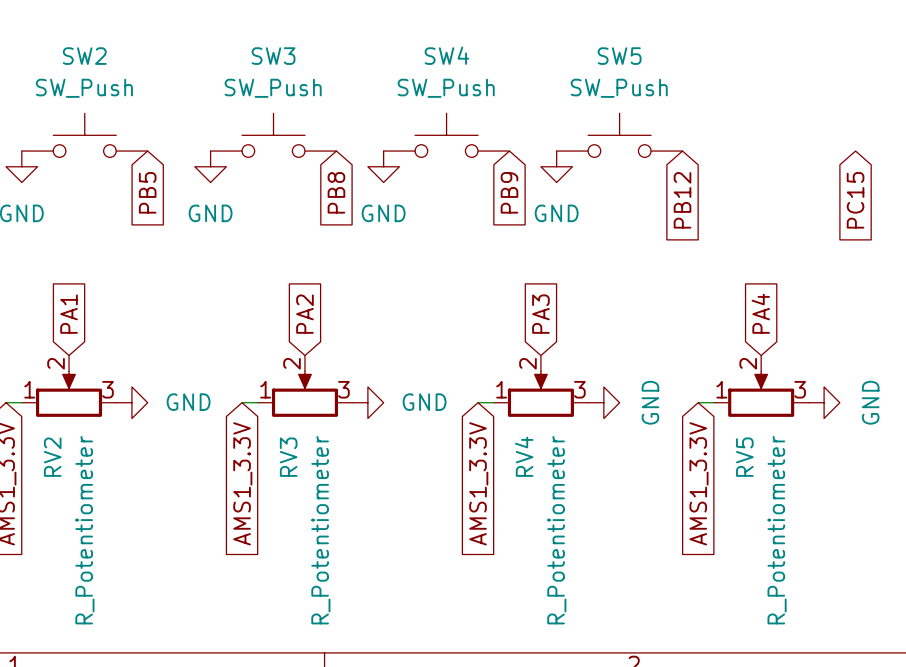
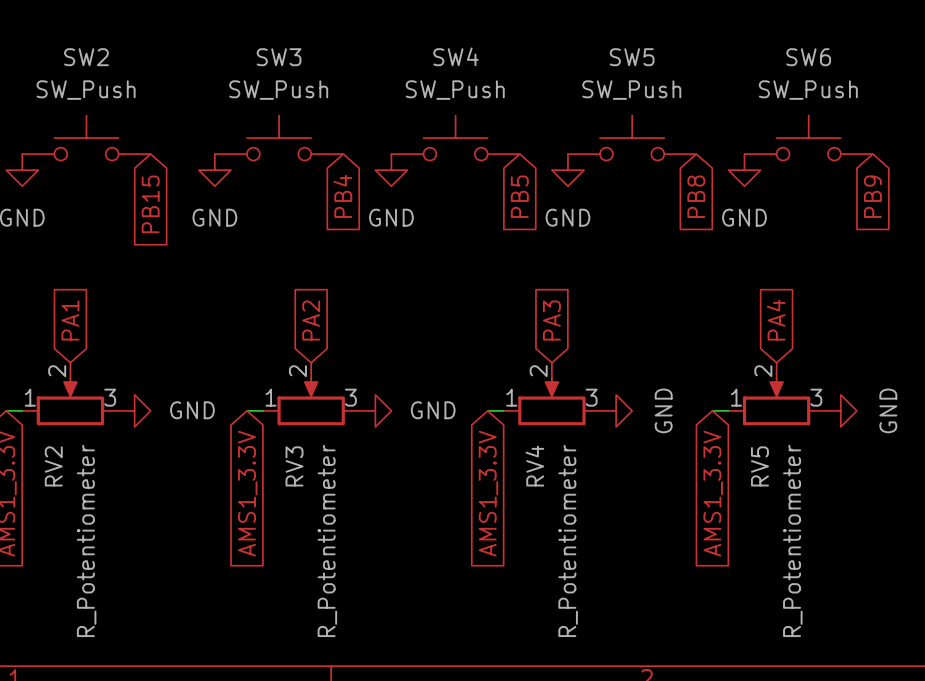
SW6: none -> SW_Push (808, 138)
power symbol: none -> GND (744, 170)
global label: PB5 (147, 192) -> PB15 (150, 204)
global label: PB8 (336, 192) -> PB4 (342, 196)
global label: PB9 (509, 192) -> PB5 (519, 196)
global label: PB12 (682, 200) -> PB8 (696, 196)
global label: PC15 (855, 200) -> PB9 (872, 196)

